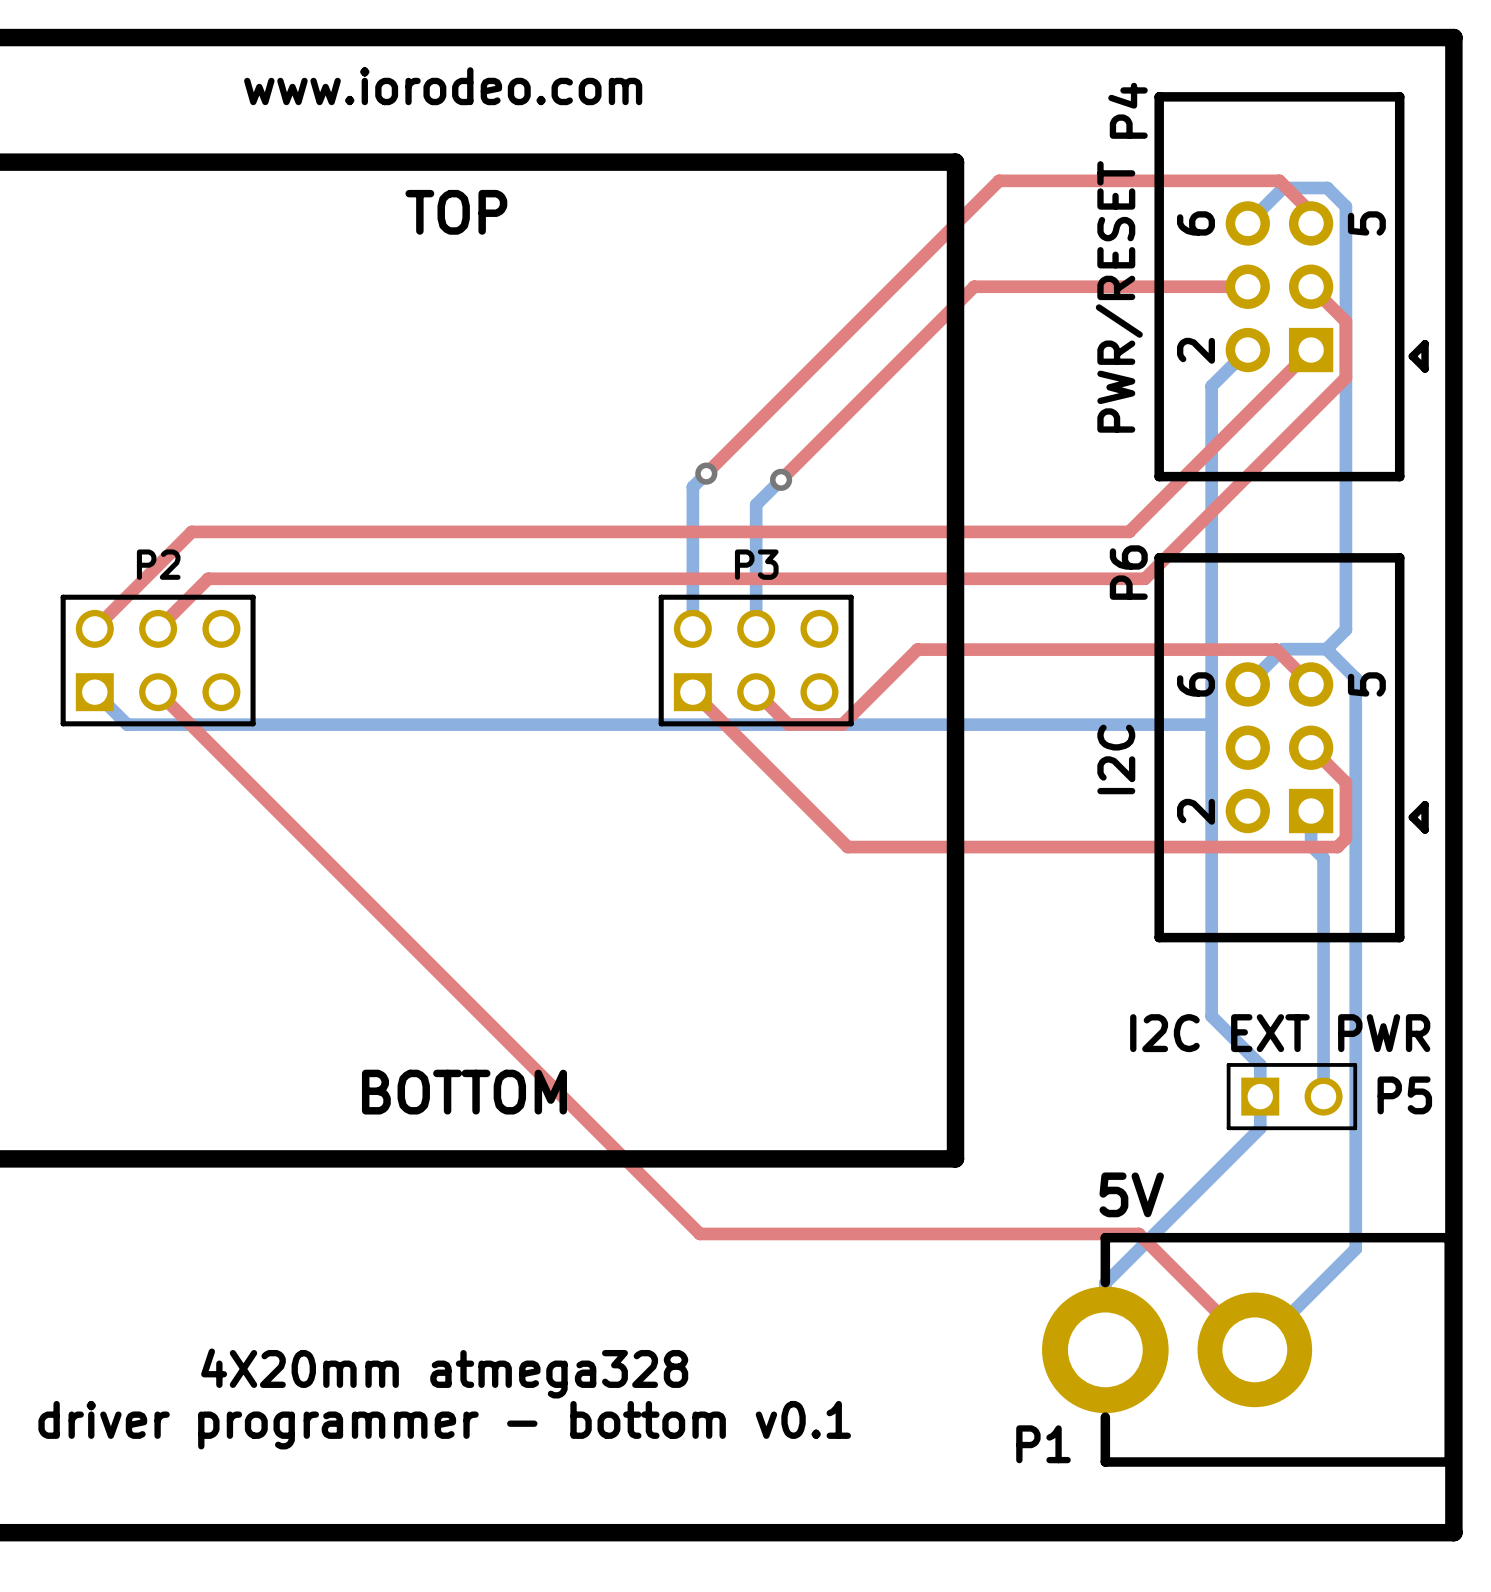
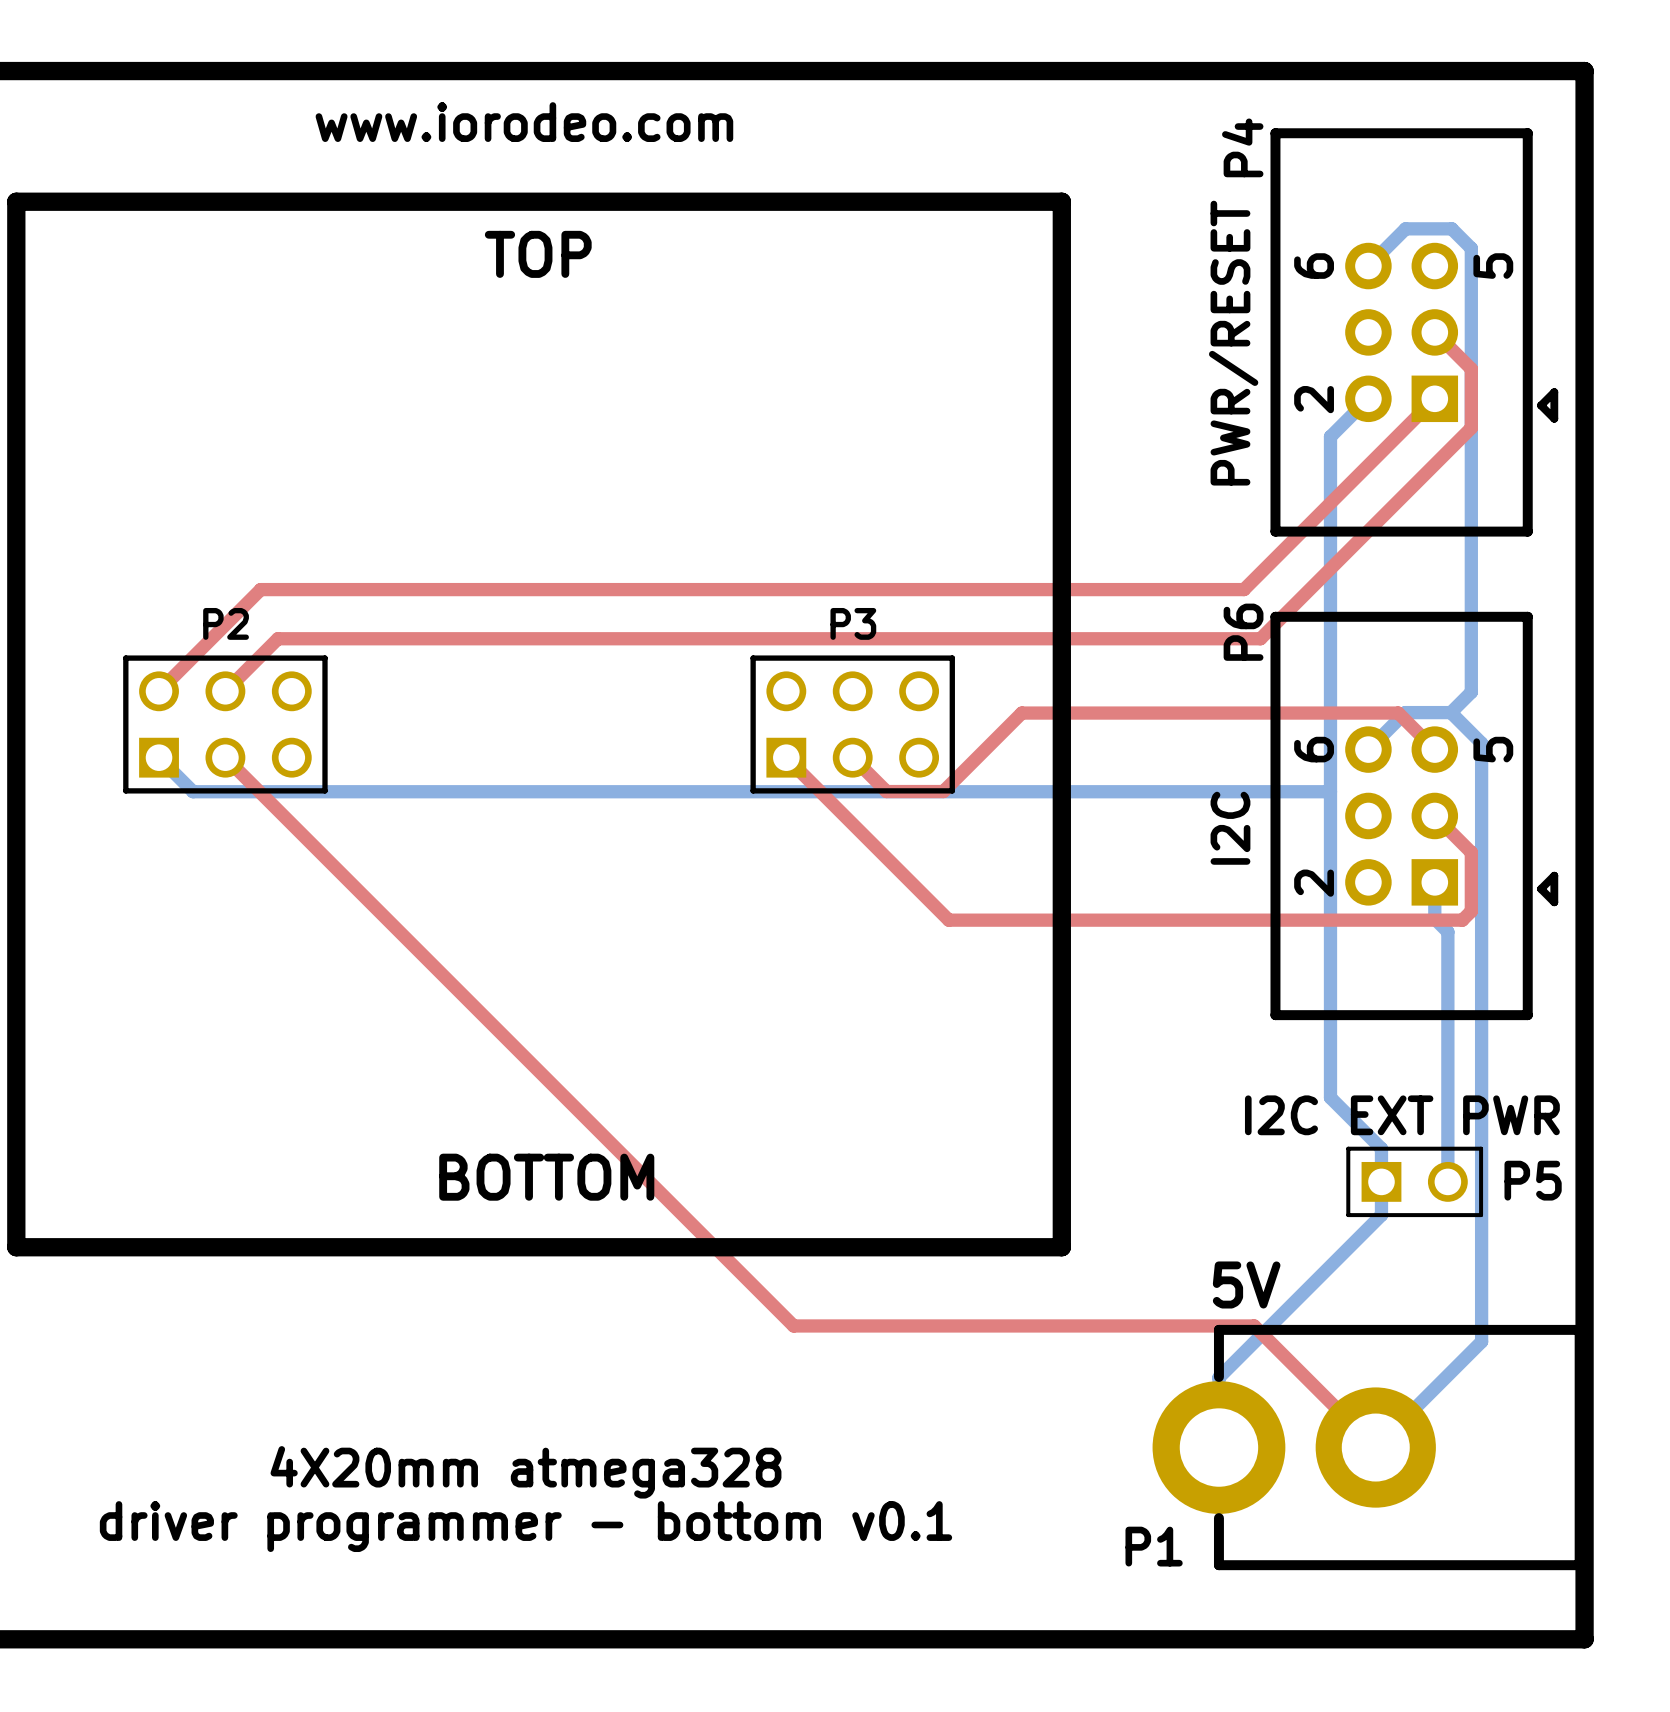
top track: (1311, 223) (1311, 212) (1279, 180) (999, 180) (706, 473) -> none
top track: (1247, 286) (974, 286) (781, 479) -> none
bottom track: (706, 473) (692, 487) (692, 628) -> none
via: (706, 473) -> none
bottom track: (781, 479) (756, 504) (756, 628) -> none
via: (781, 479) -> none

